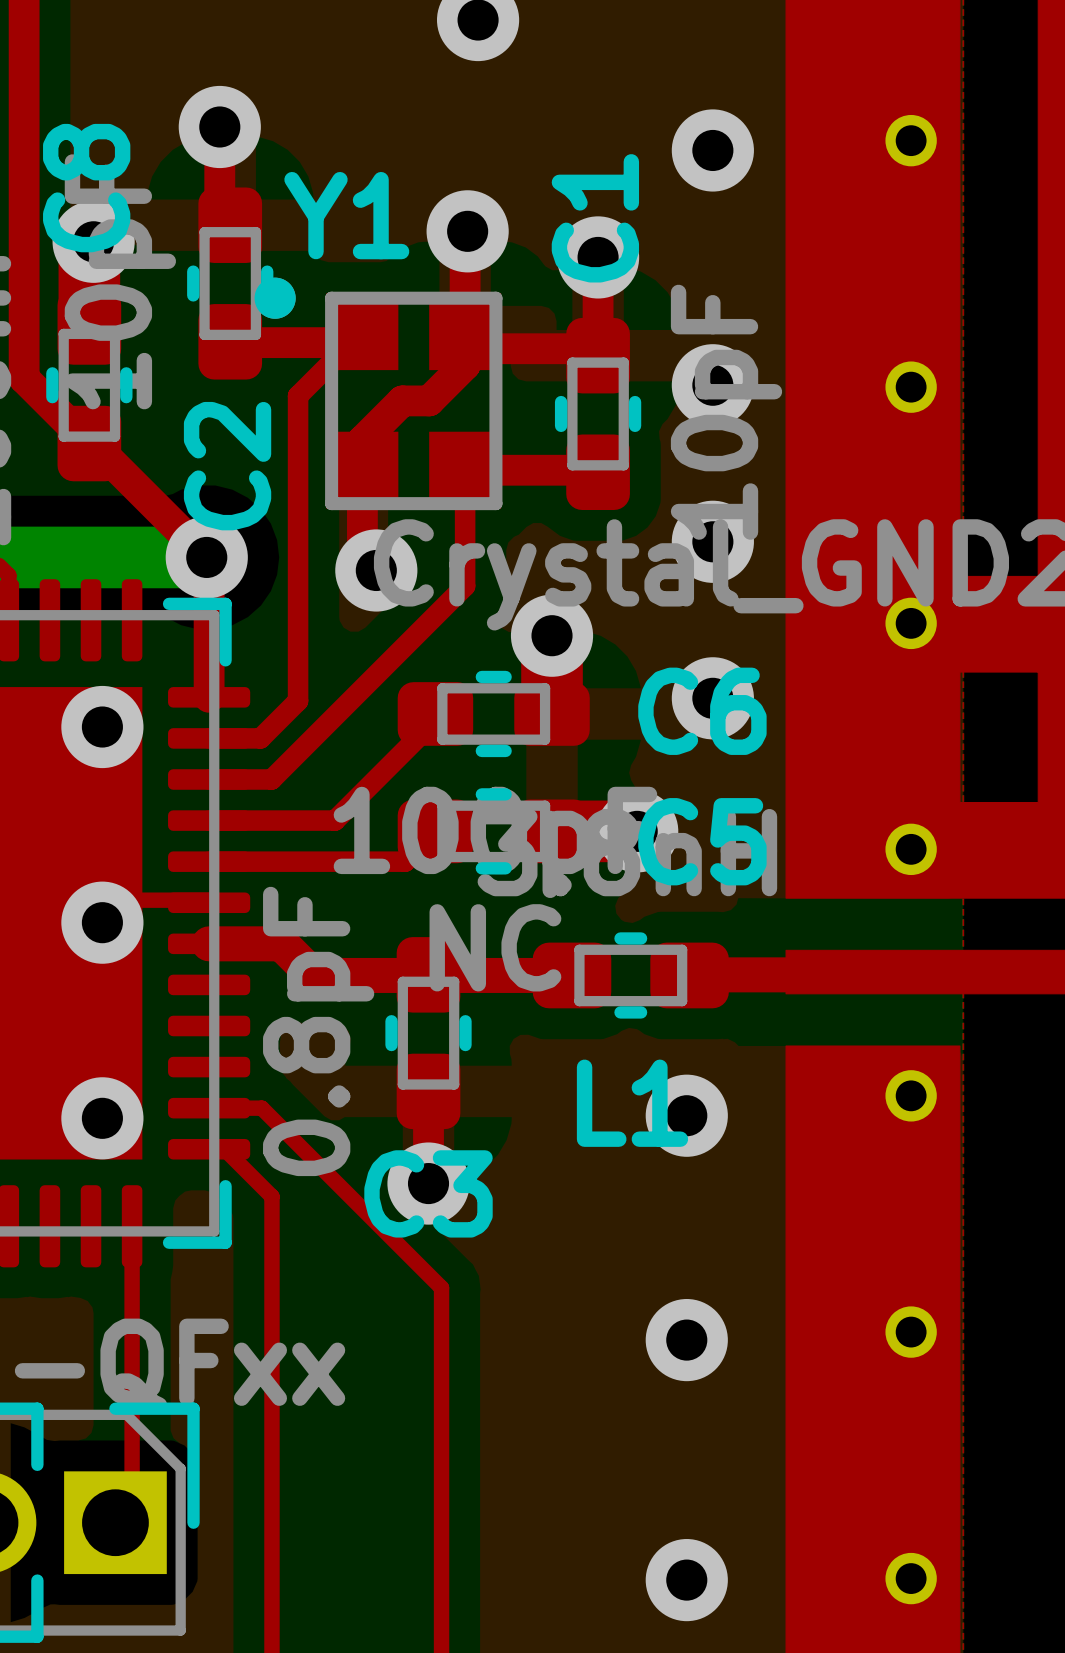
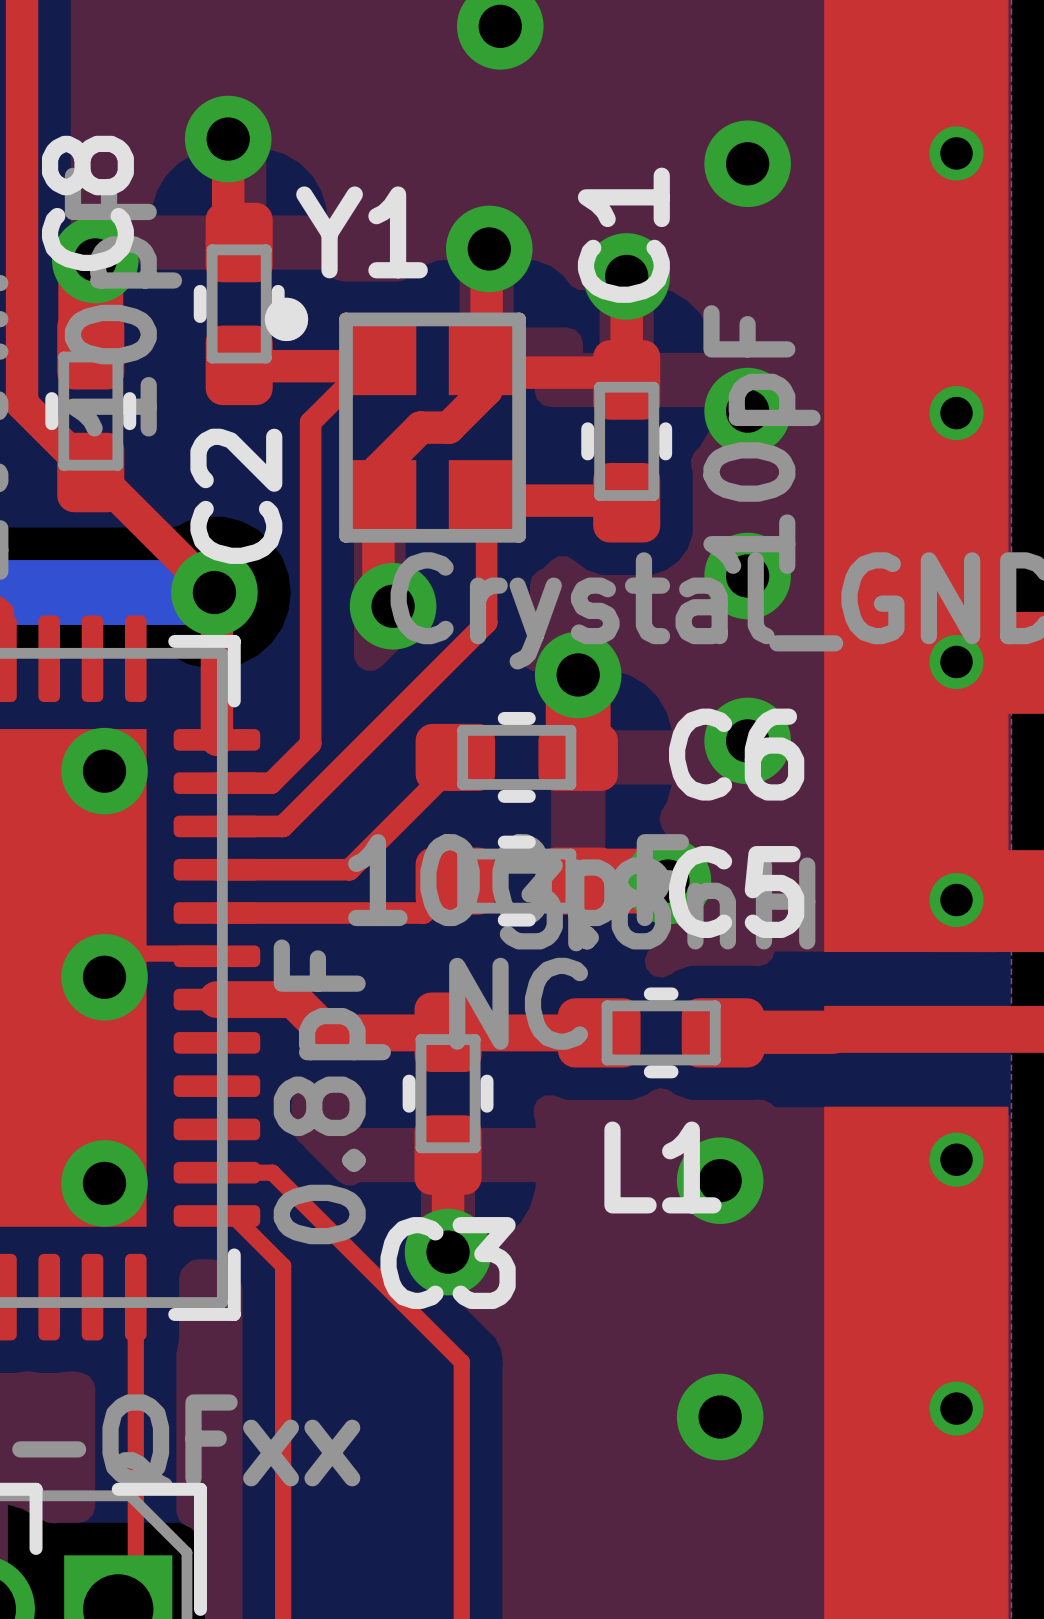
top track width: thin (689, 974) (793, 974) -> thick (722, 1032) (832, 1032)

